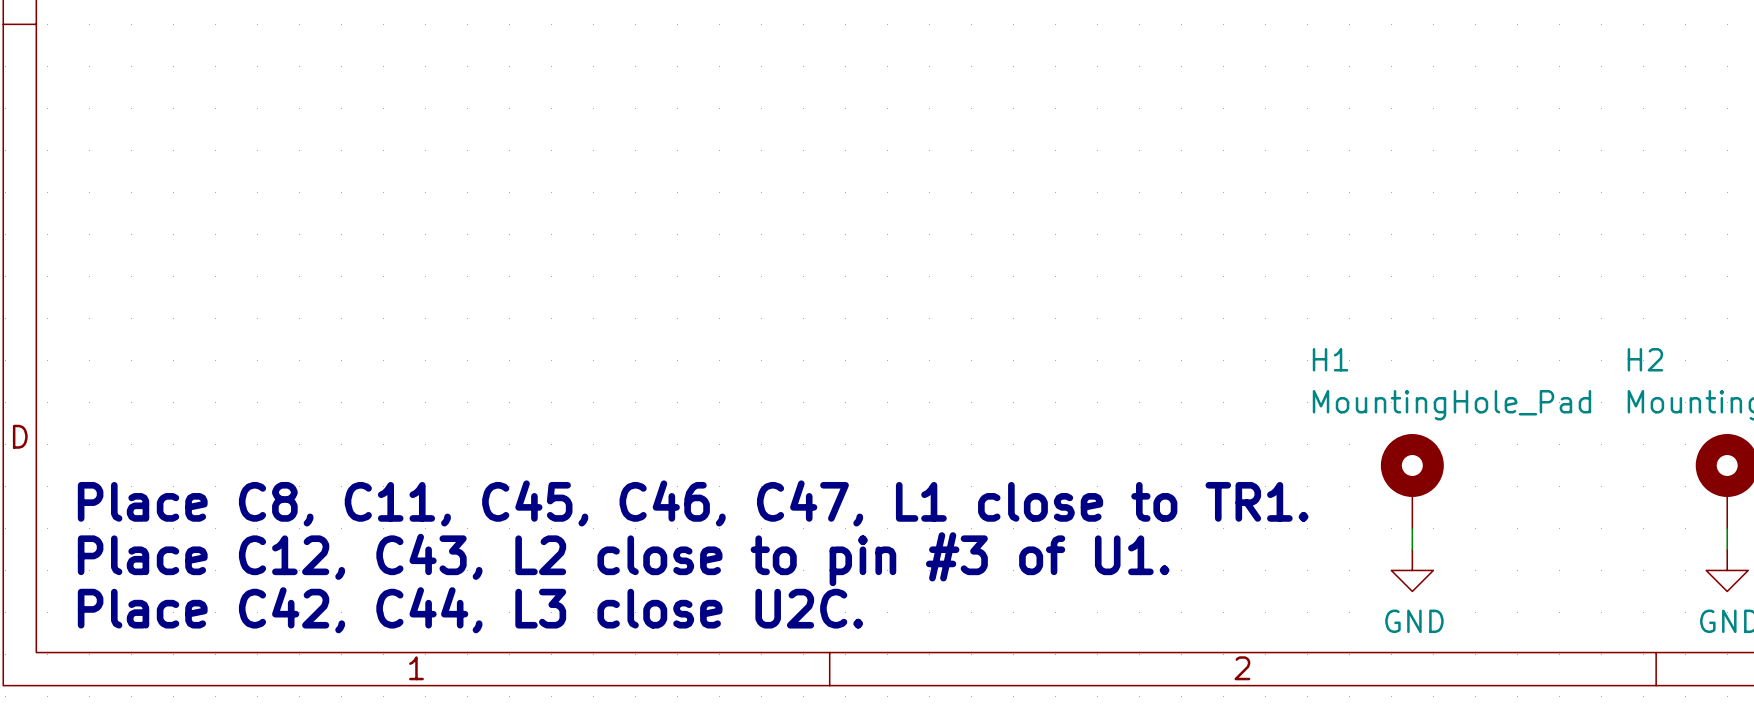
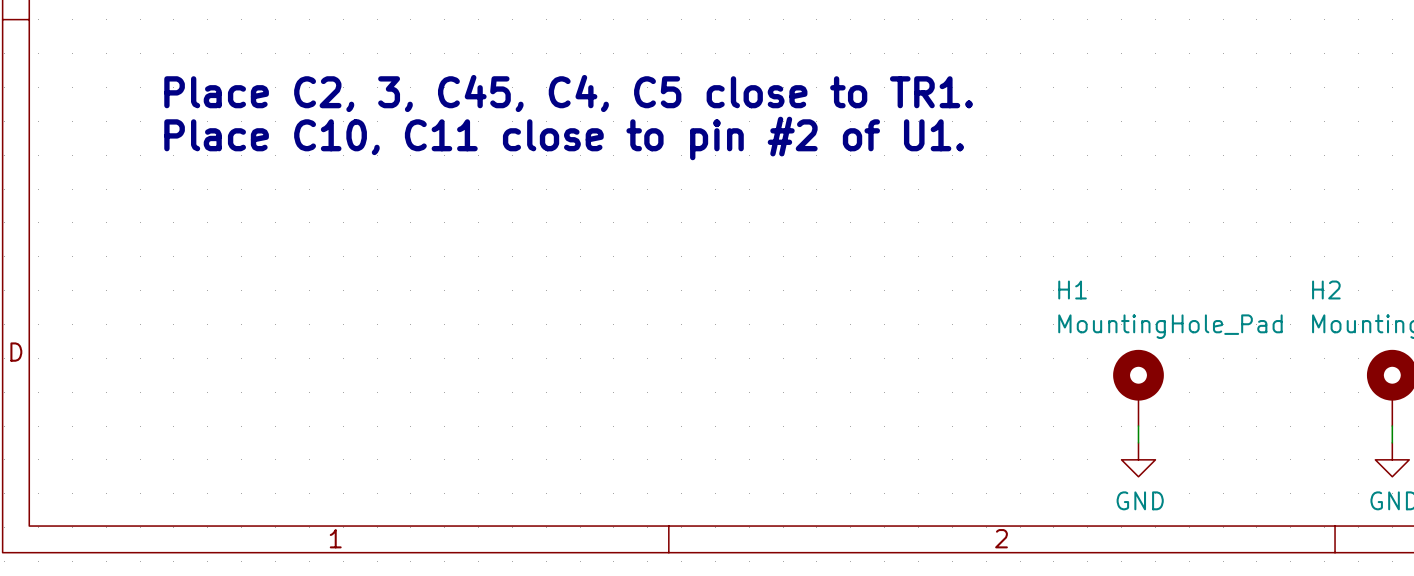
text: none -> Place C2, 3, C45, C4, C5 close to TR1. (568, 93)
text: none -> Place C10, C11 close to pin #2 of U1. (564, 138)
text: Place C8, C11, C45, C46, C47, L1 close to TR1. (693, 503) -> none
text: Place C12, C43, L2 close to pin #3 of U1. (623, 559) -> none
text: Place C42, C44, L3 close U2C. (470, 610) -> none

